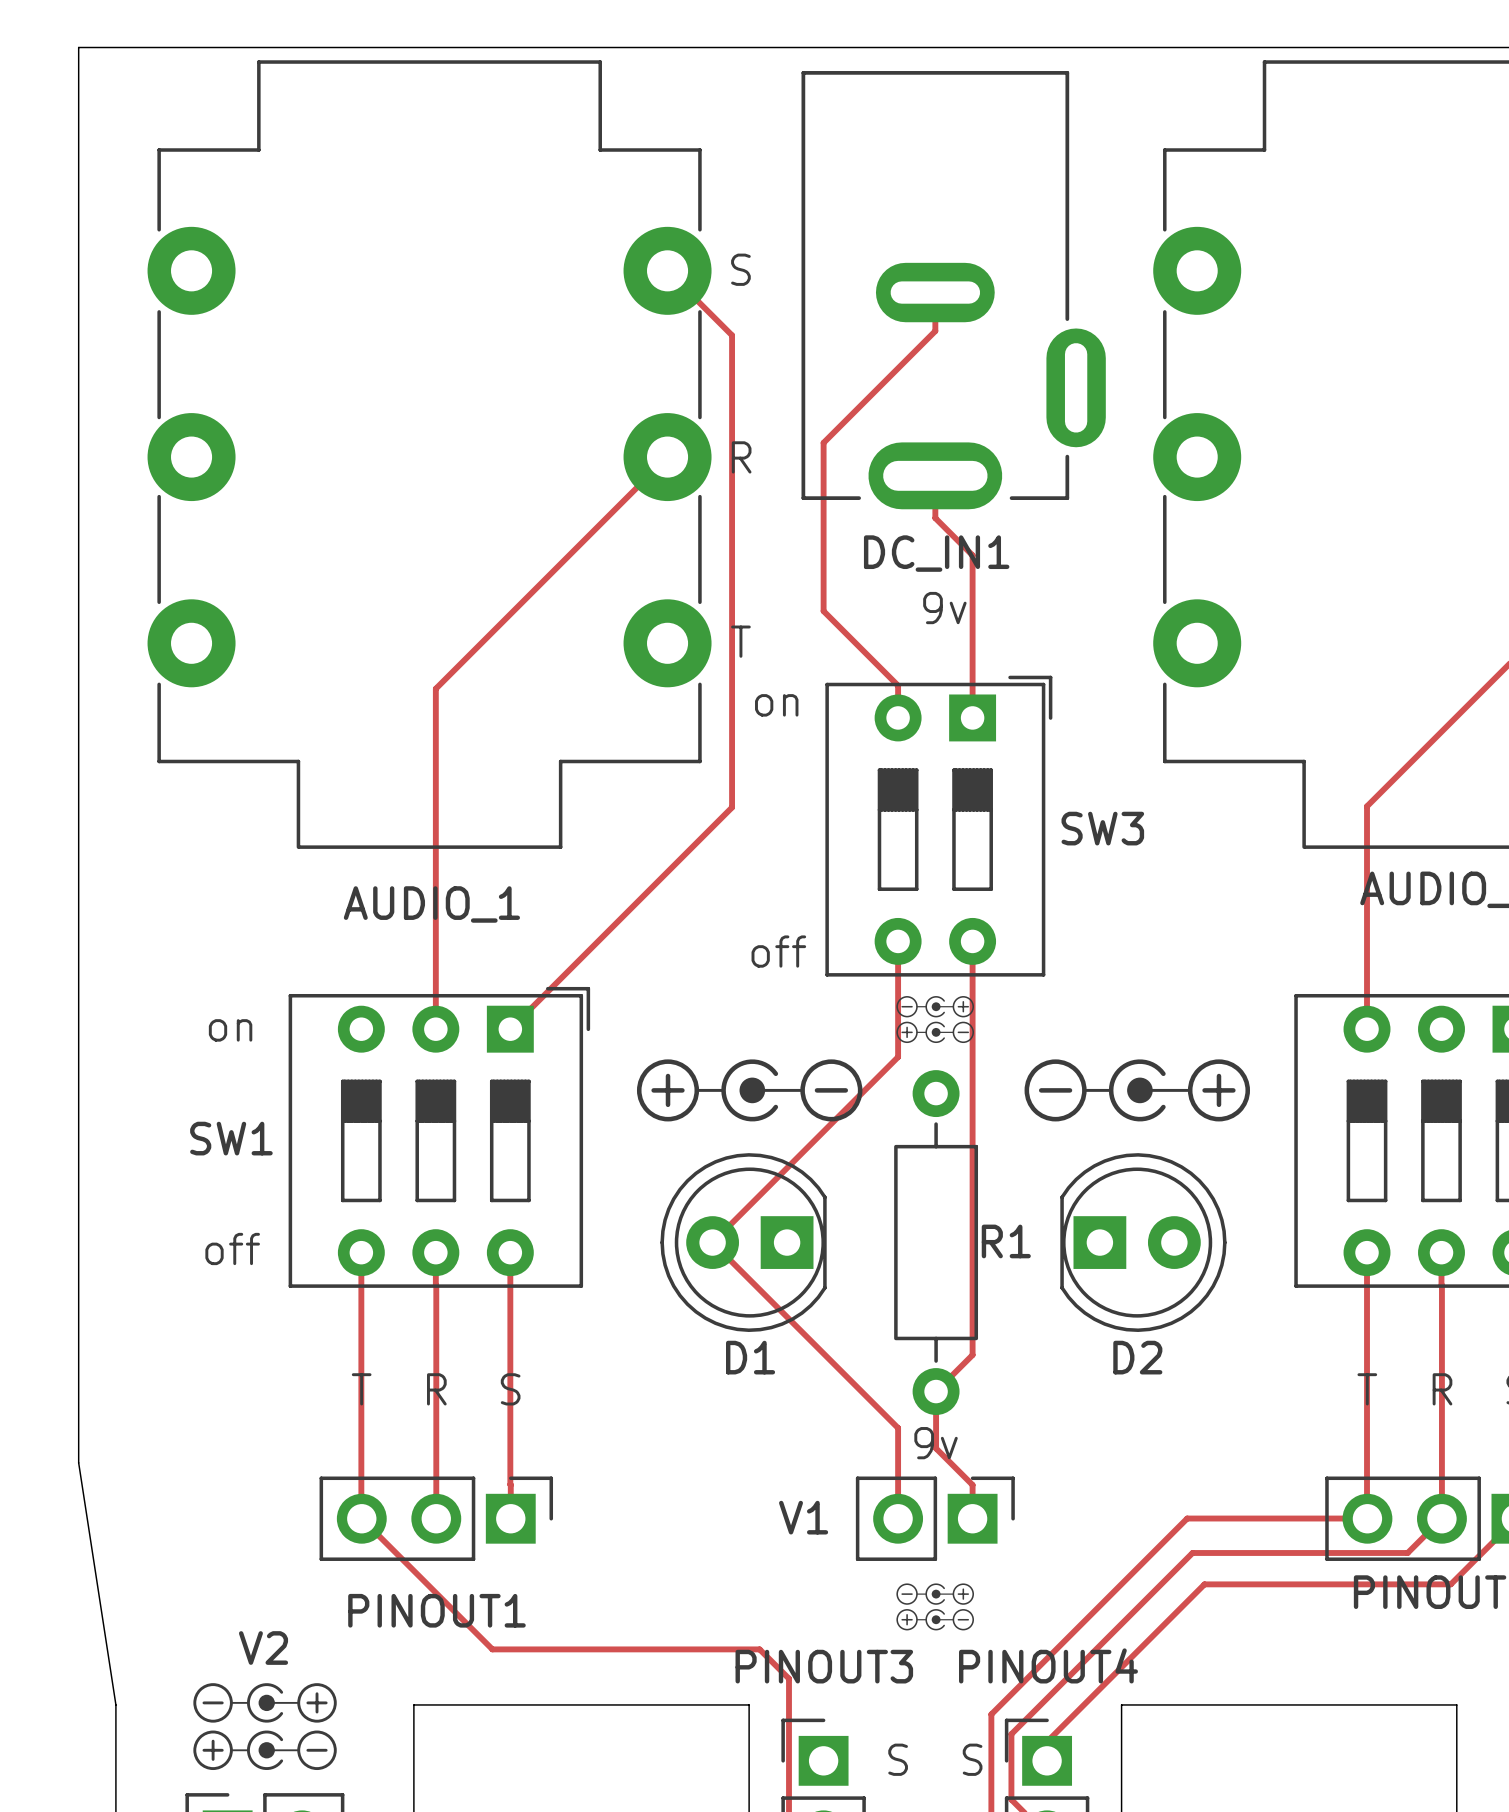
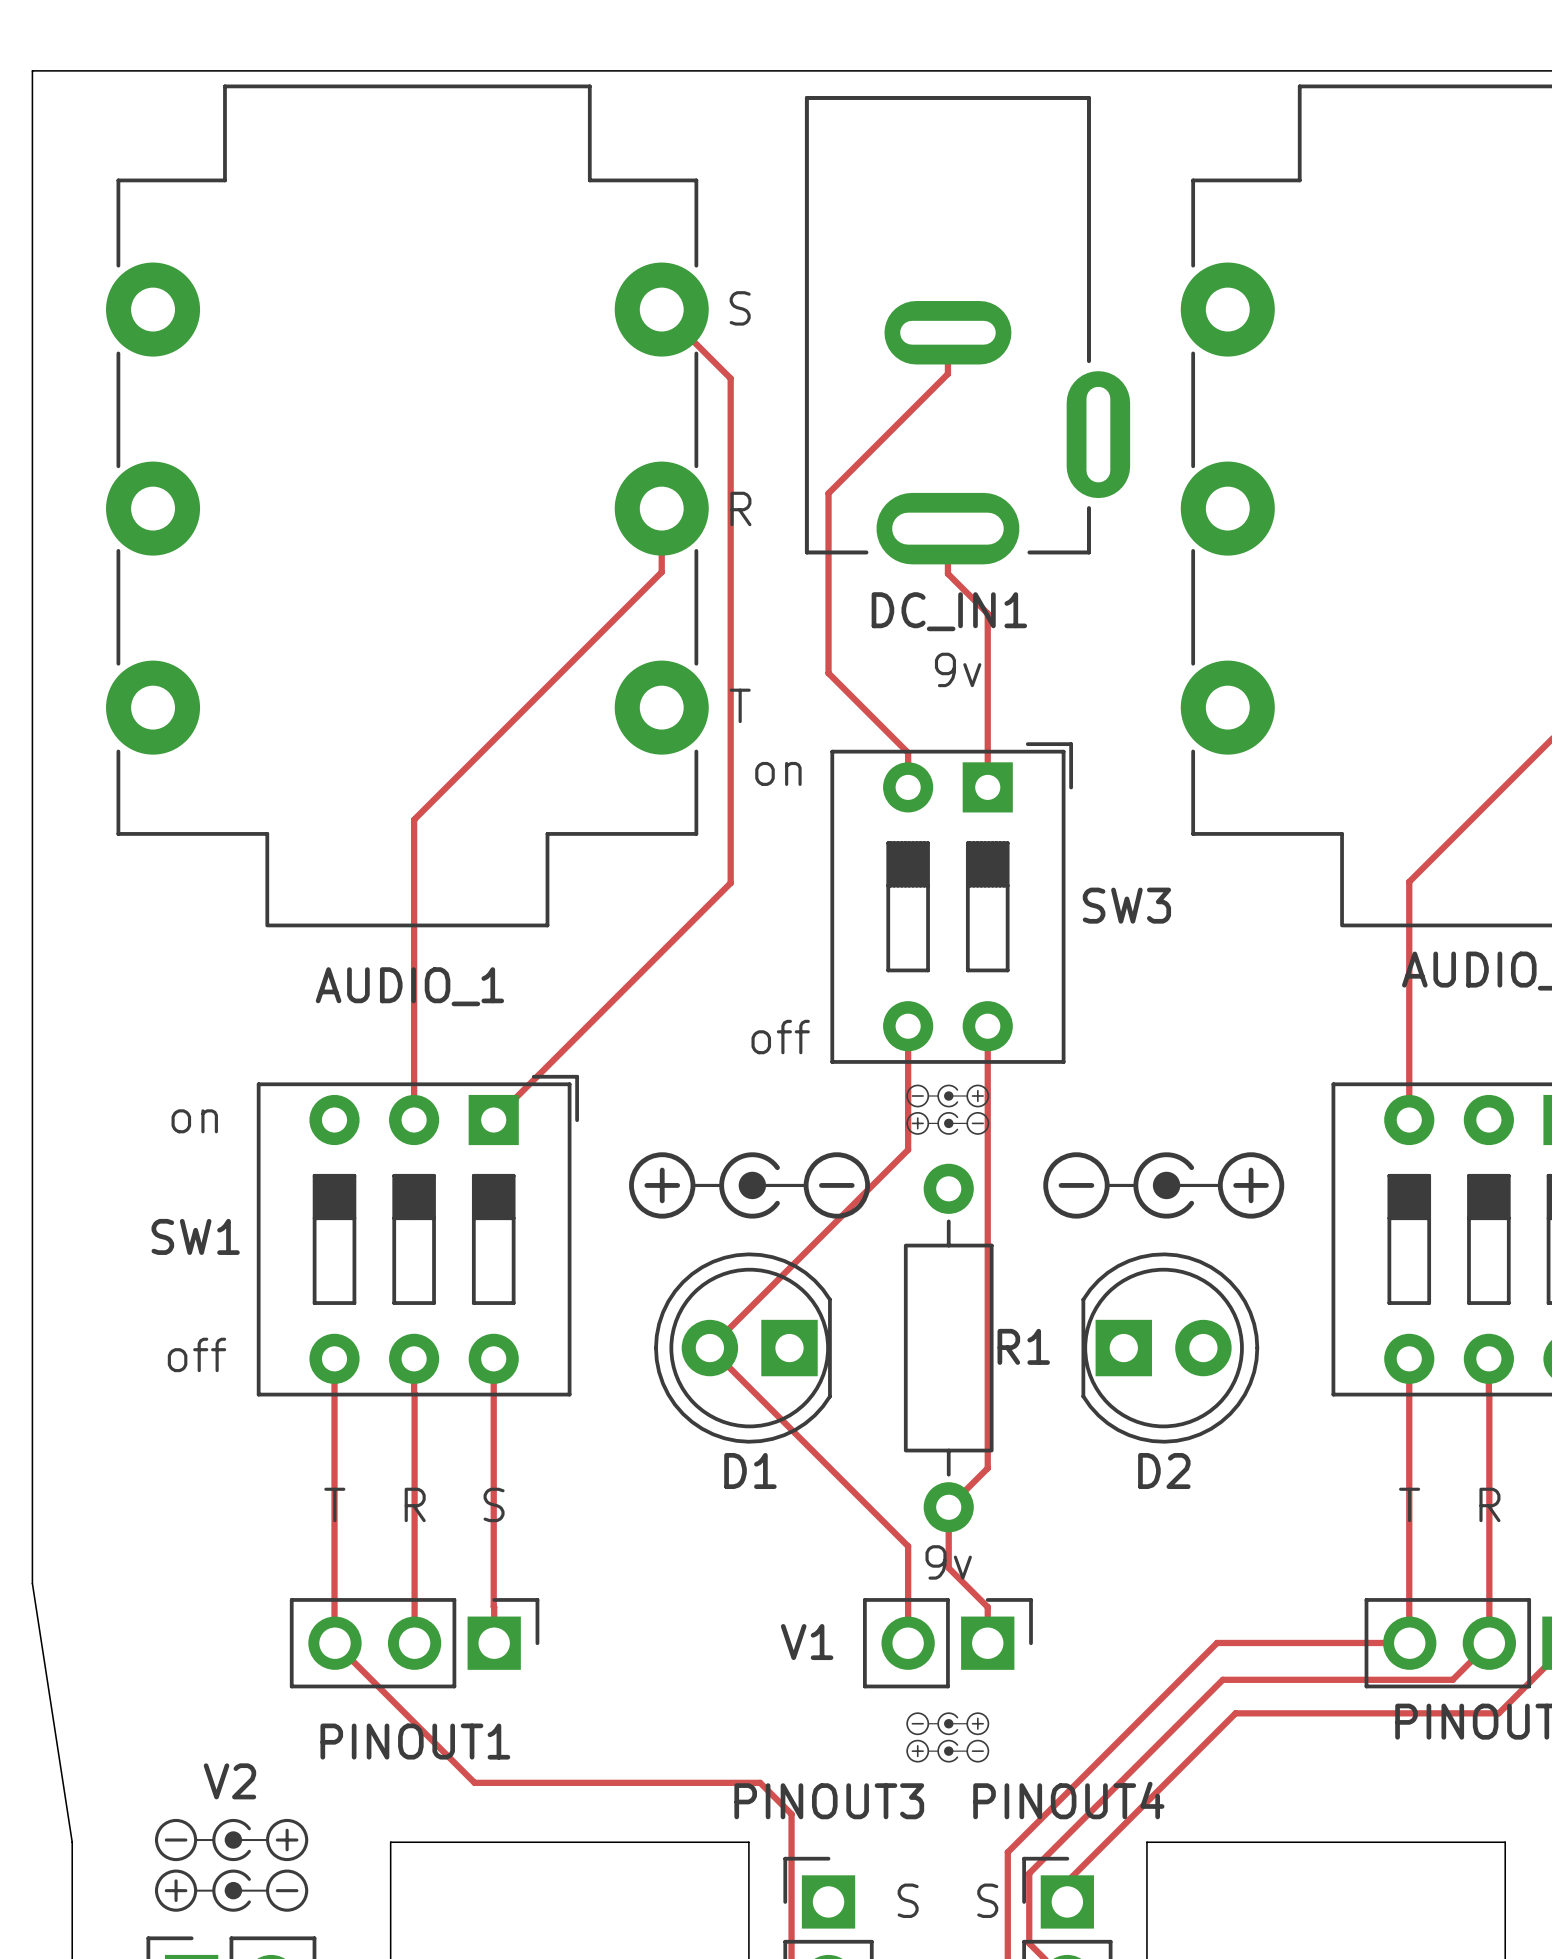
track: (667, 457) (435, 688) (435, 748) -> (661, 508) (661, 572) (414, 819)

